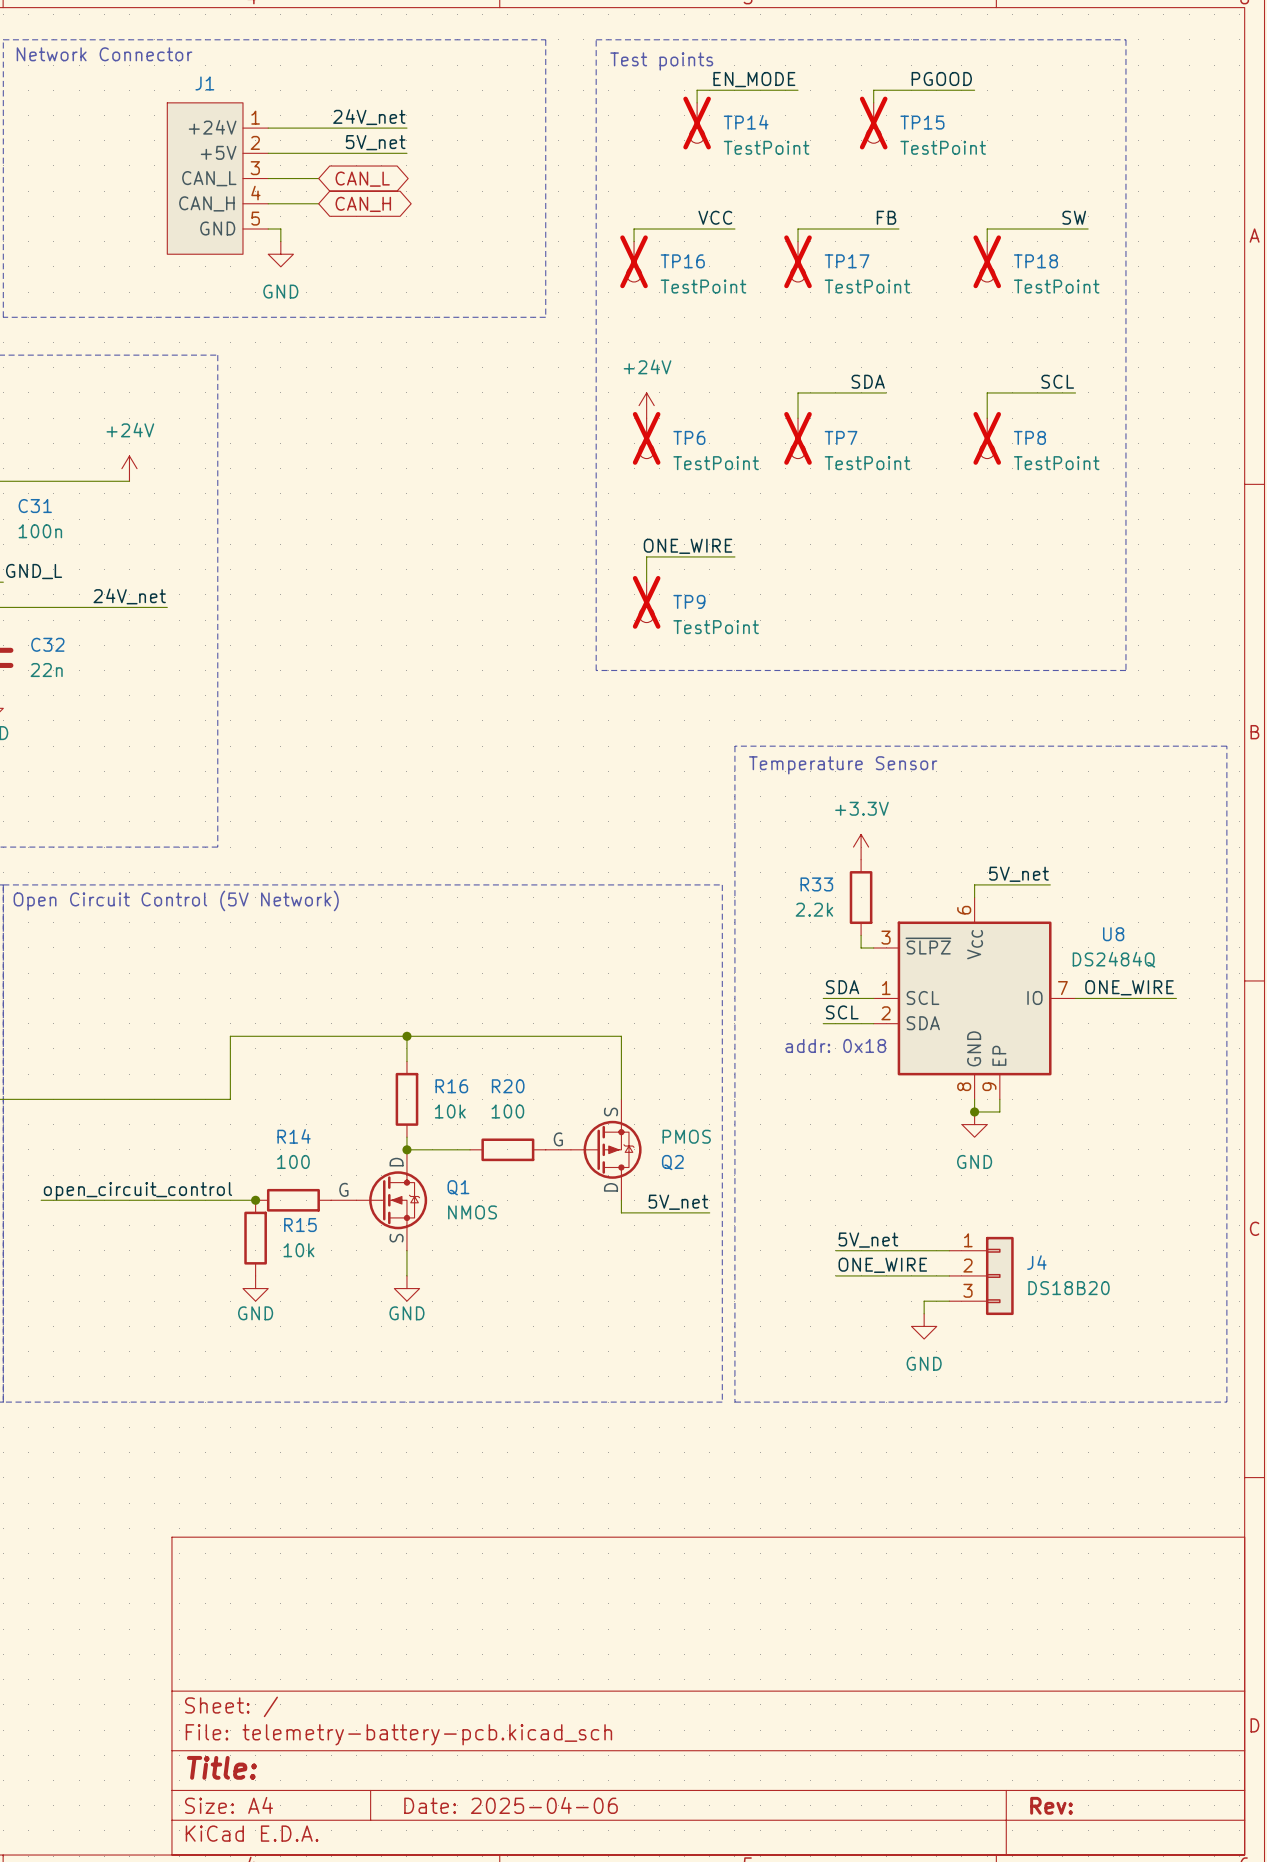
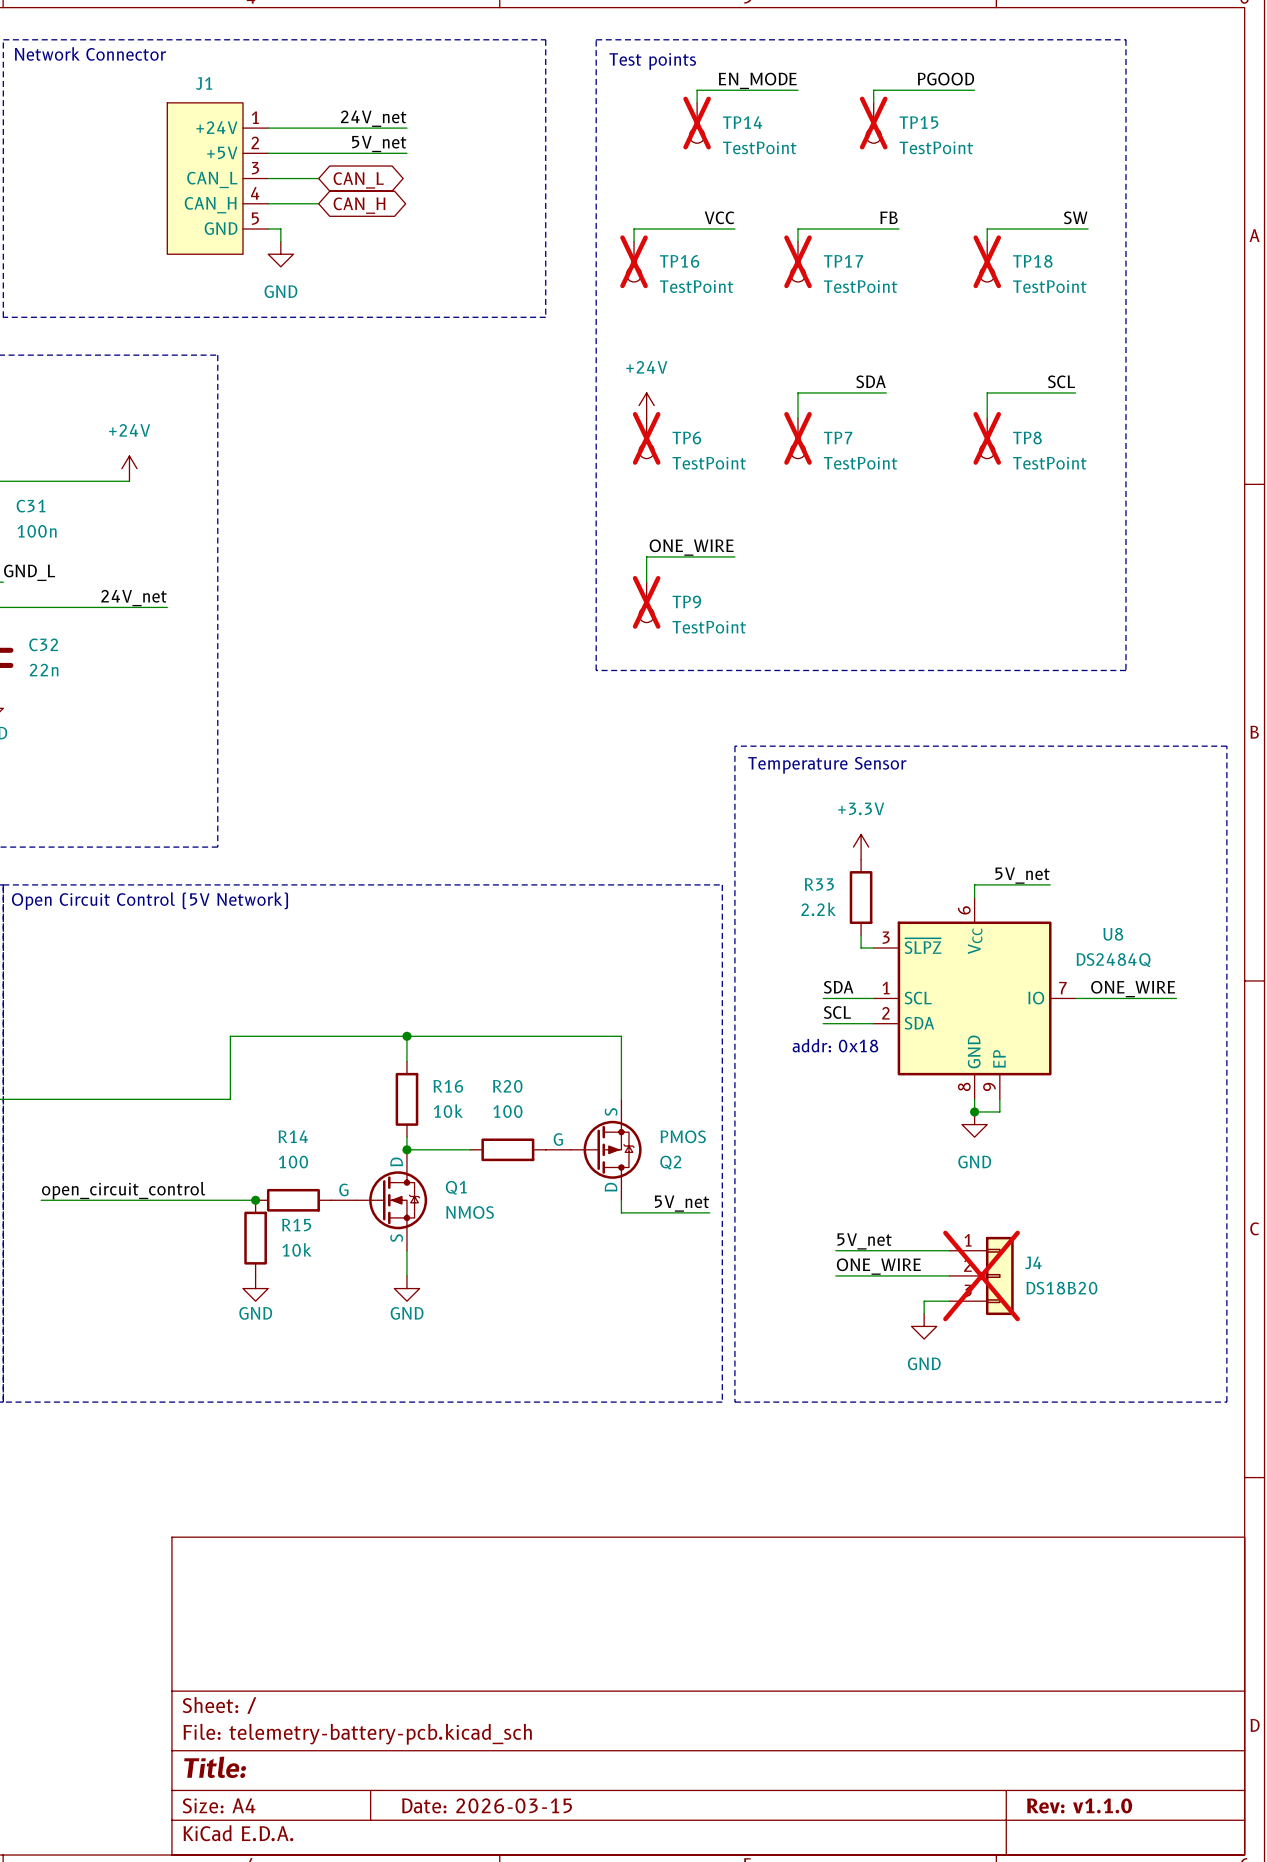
J4 do-not-place cross: none -> (981, 1275)
title block: Date: 2025-04-06 (511, 1805) -> Date: 2026-03-15 (487, 1805)
title block: Rev: (1051, 1805) -> Rev: v1.1.0 (1079, 1805)

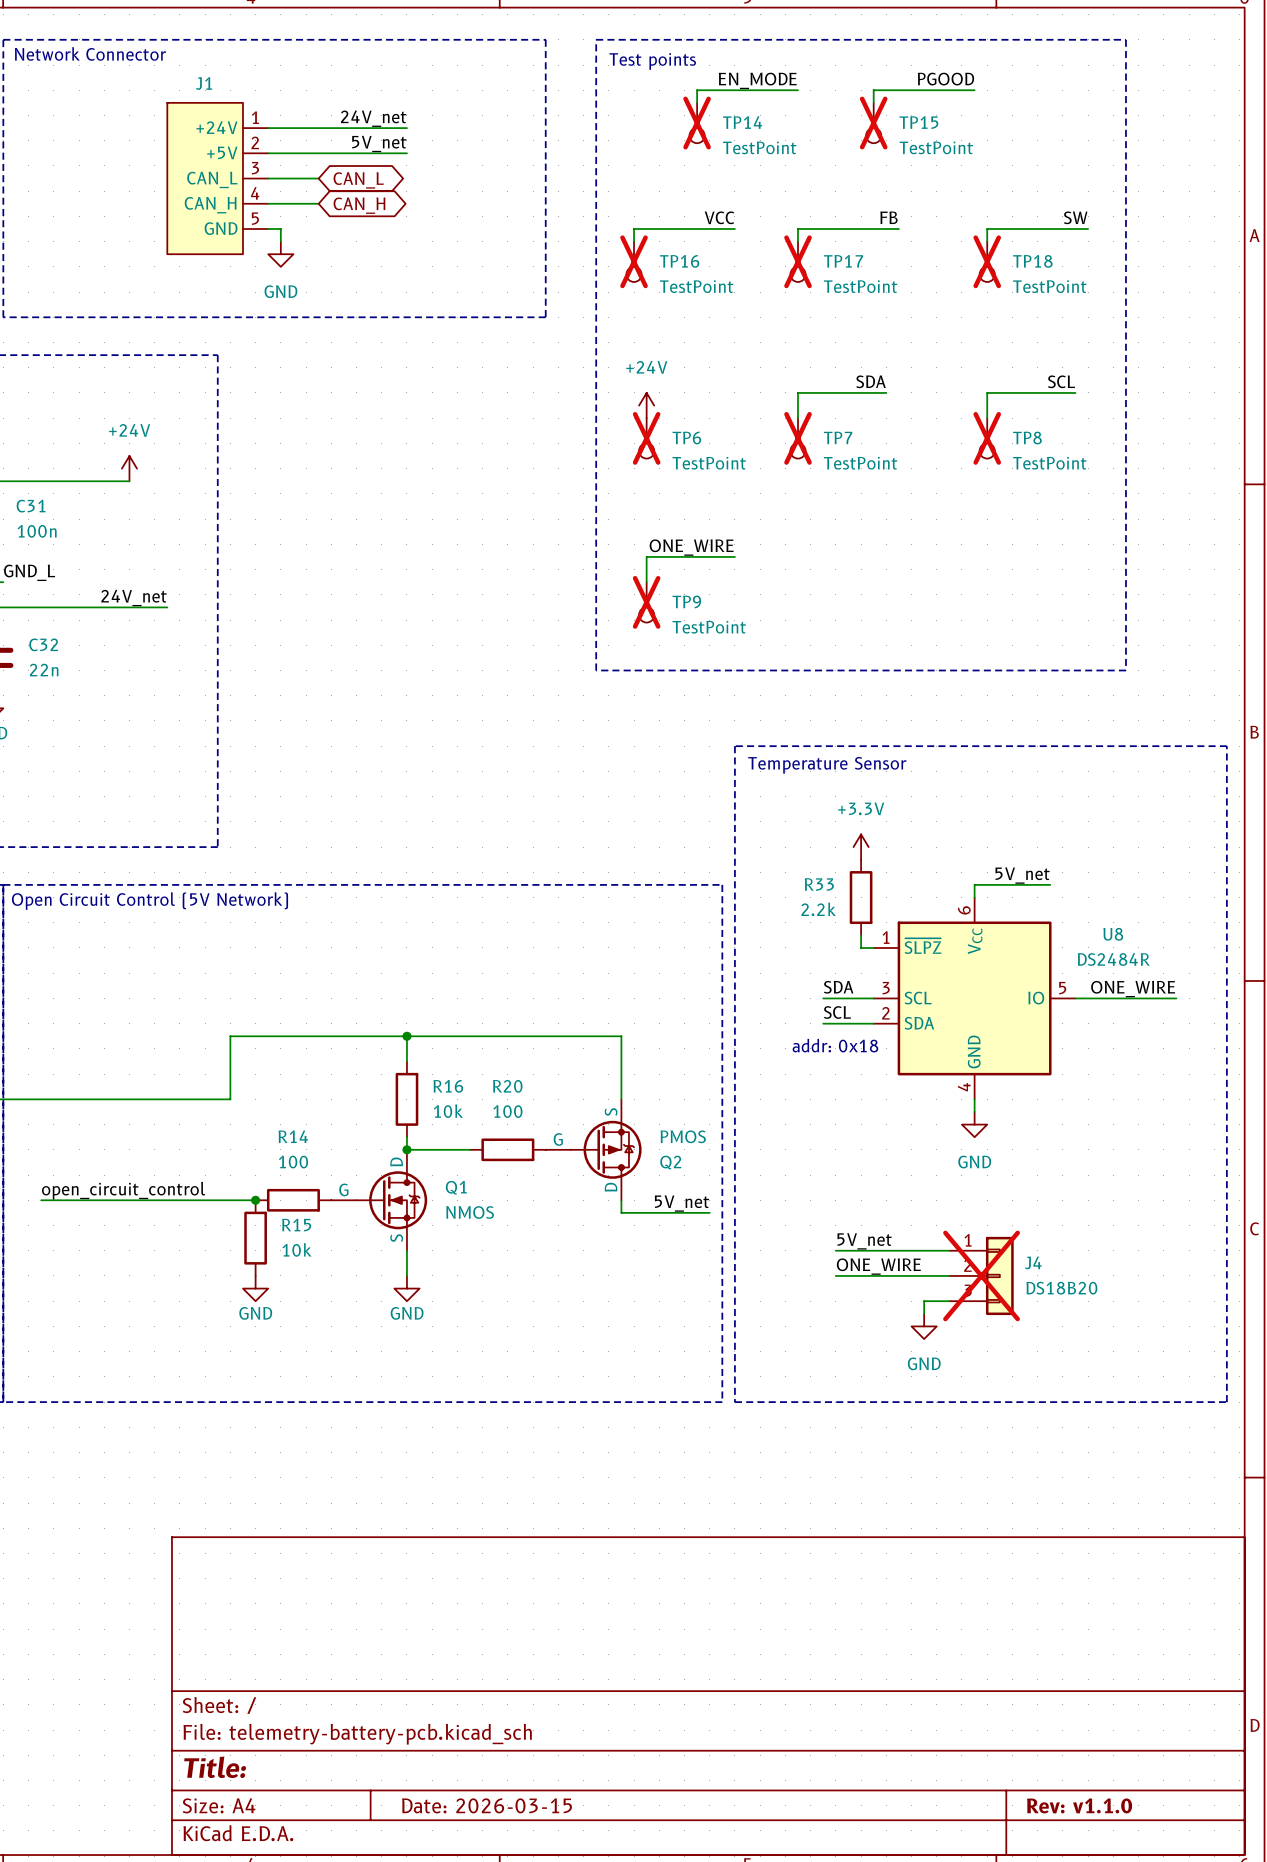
U8 symbol: [873, 897, 1076, 1100] -> [873, 897, 1076, 1100]
U8 value: DS2484Q (1113, 960) -> DS2484R (1113, 959)
wire: (999, 1099) (999, 1111) (974, 1111) -> none
junction: (974, 1111) -> none

